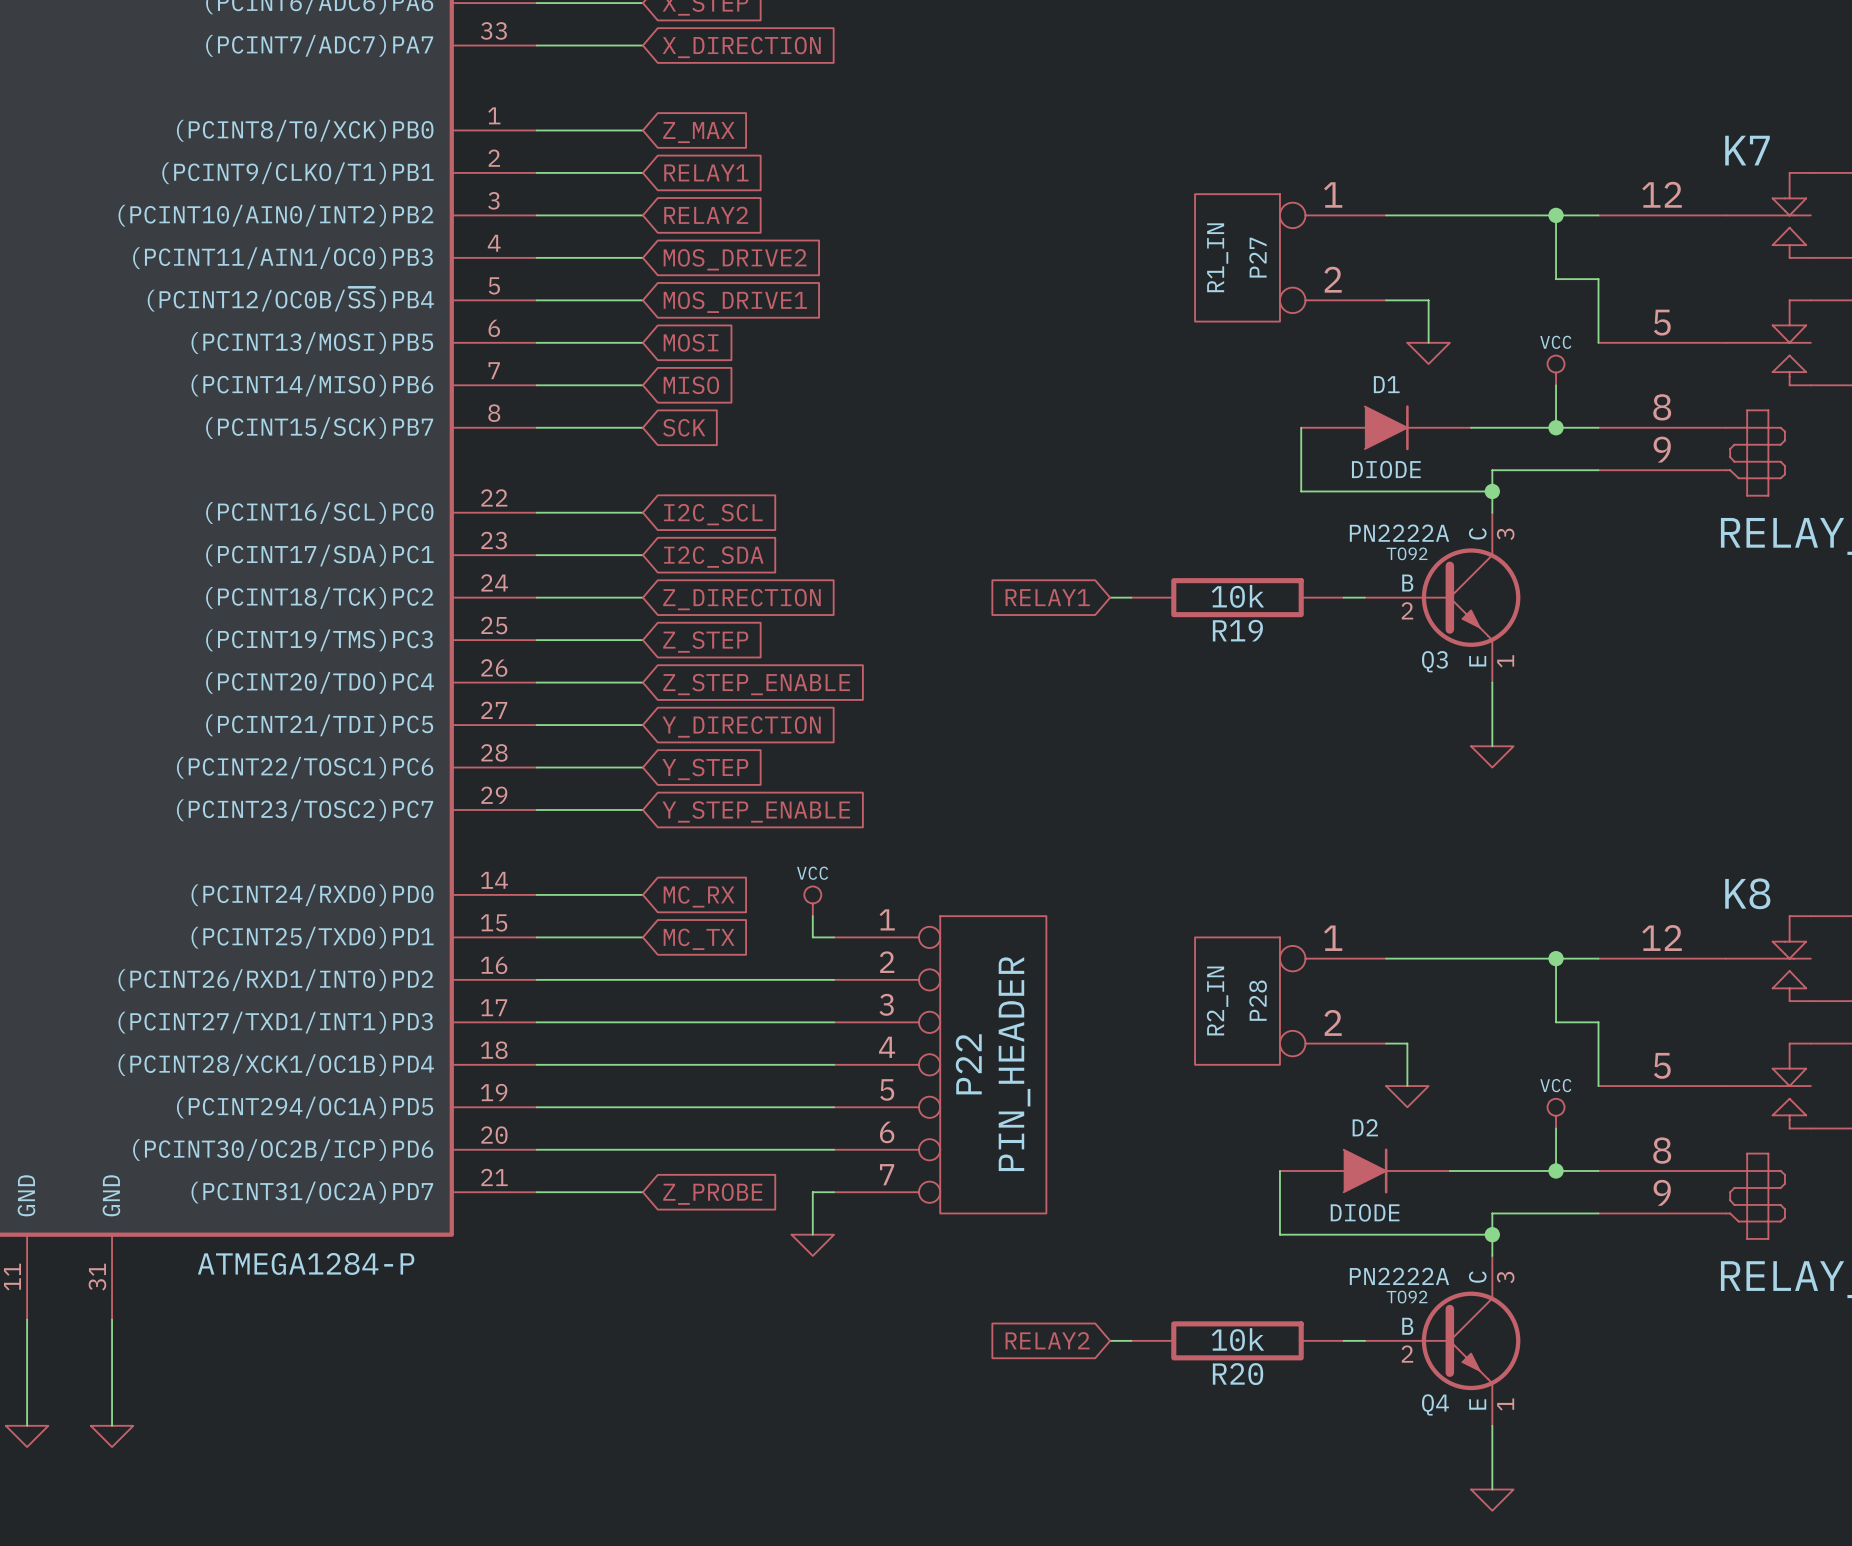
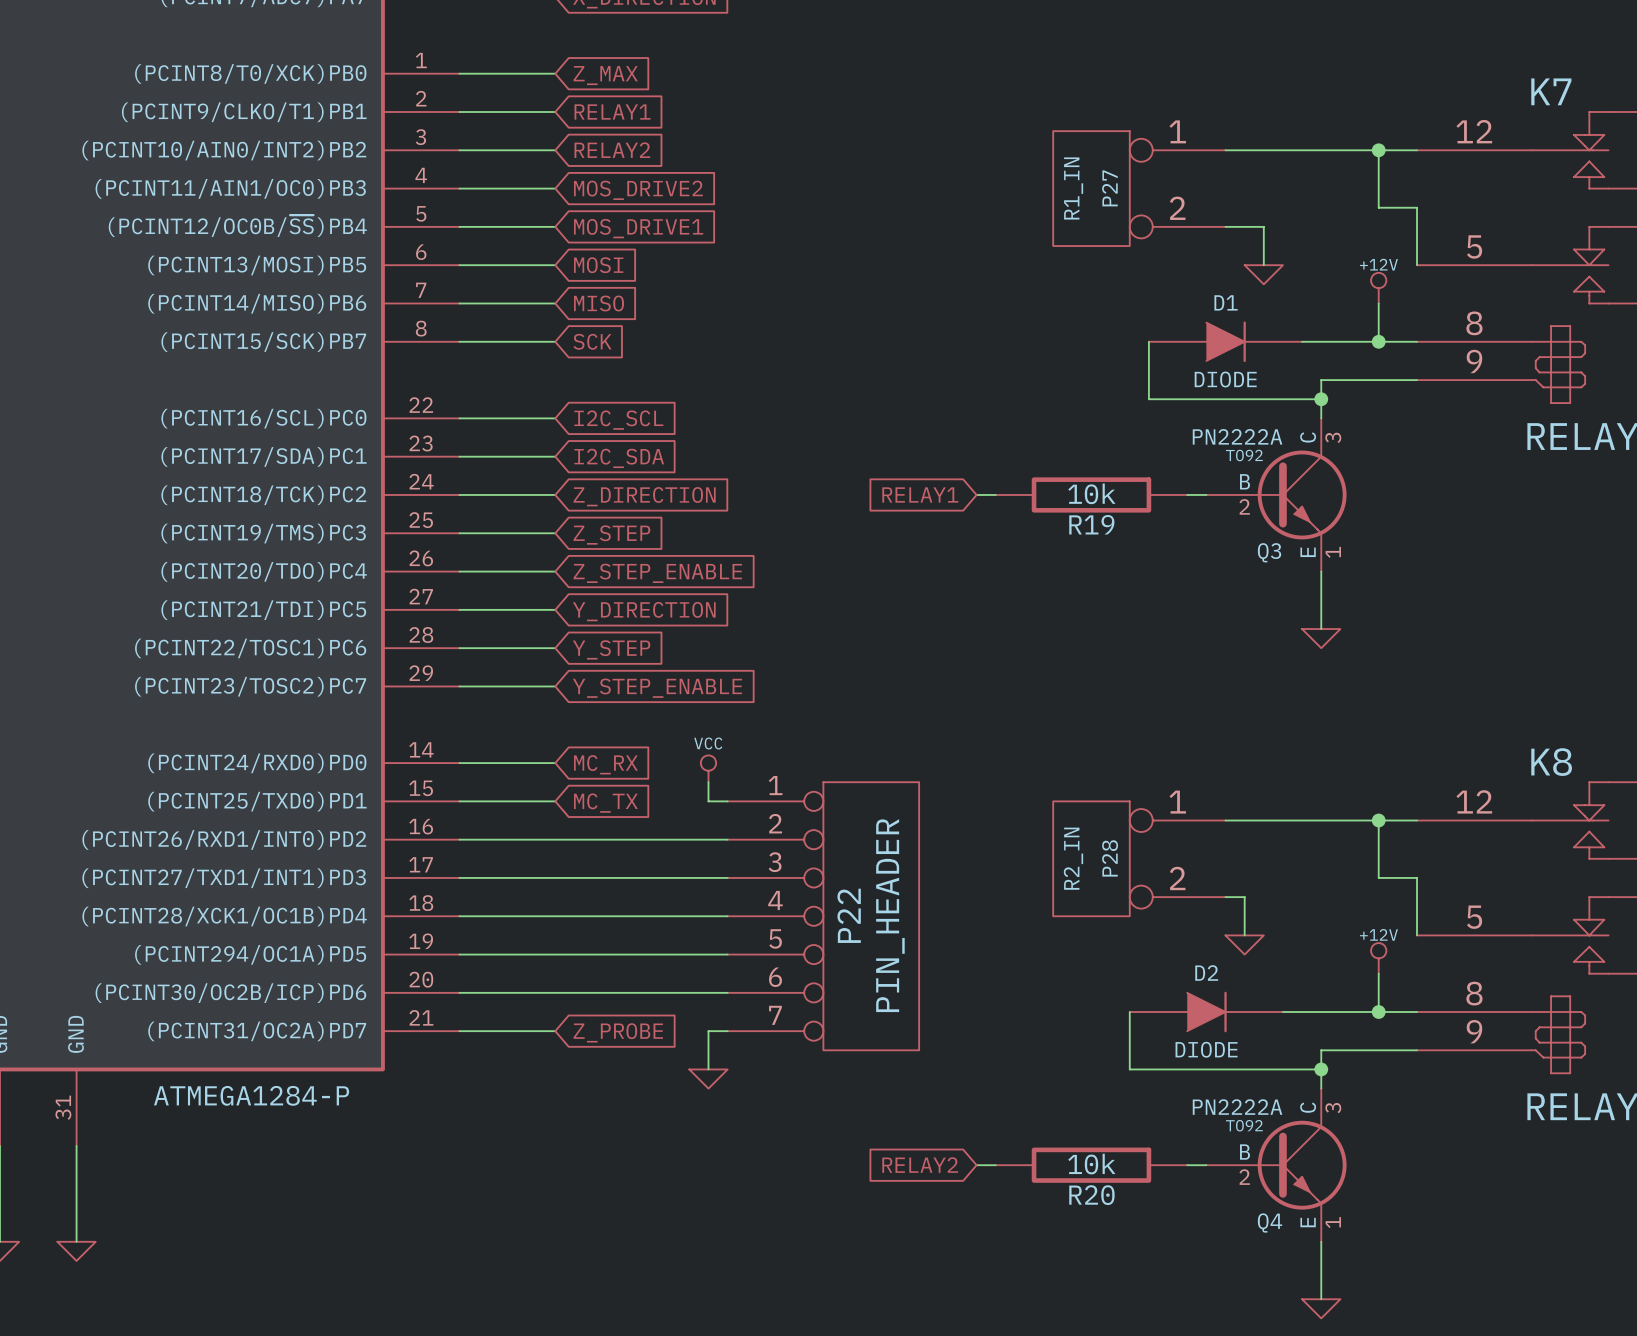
power symbol: VCC (1556, 370) -> +12V (1378, 288)
power symbol: VCC (1556, 1113) -> +12V (1378, 958)

